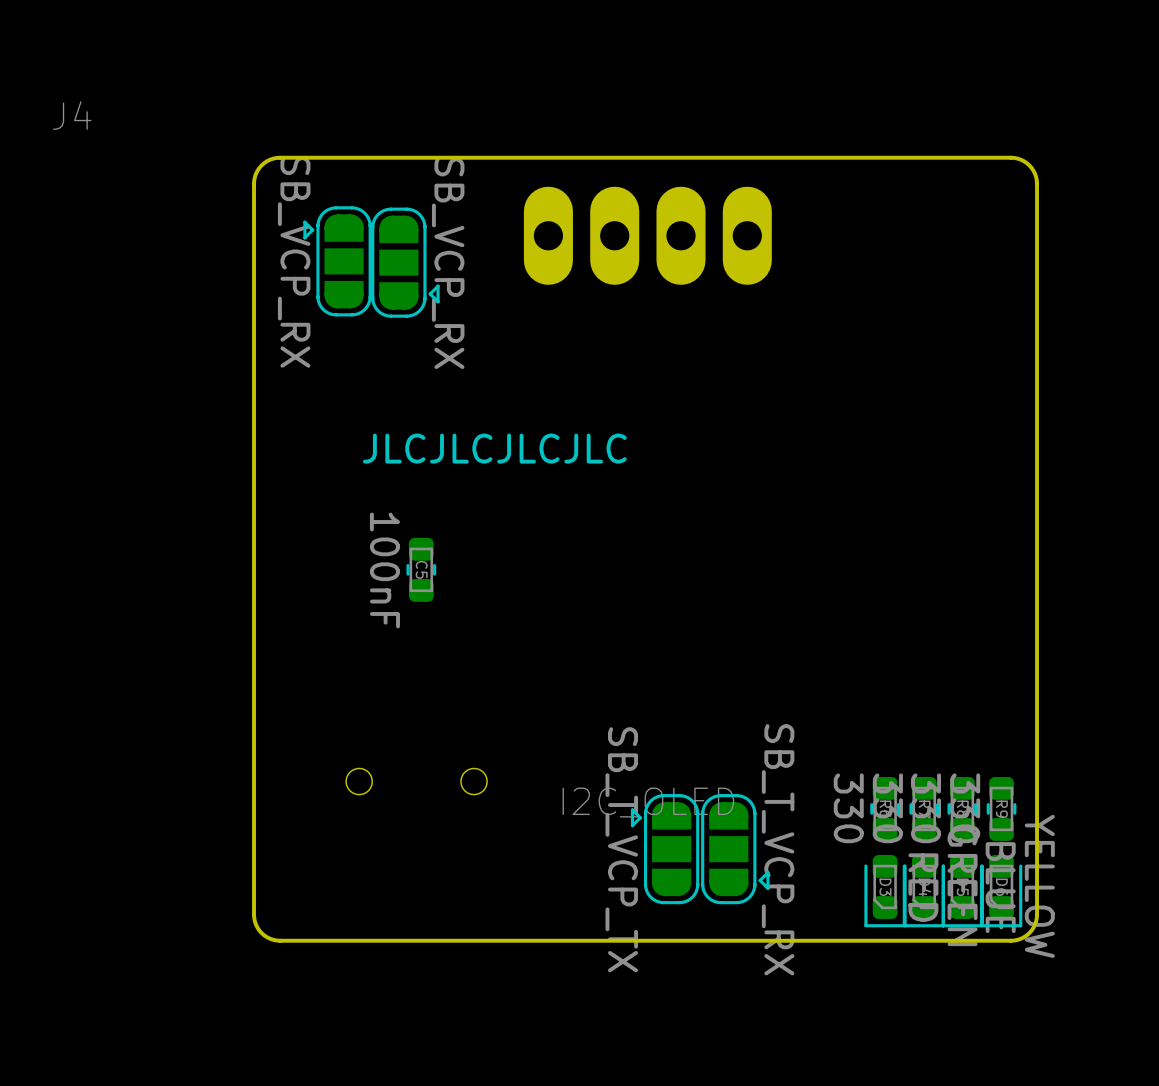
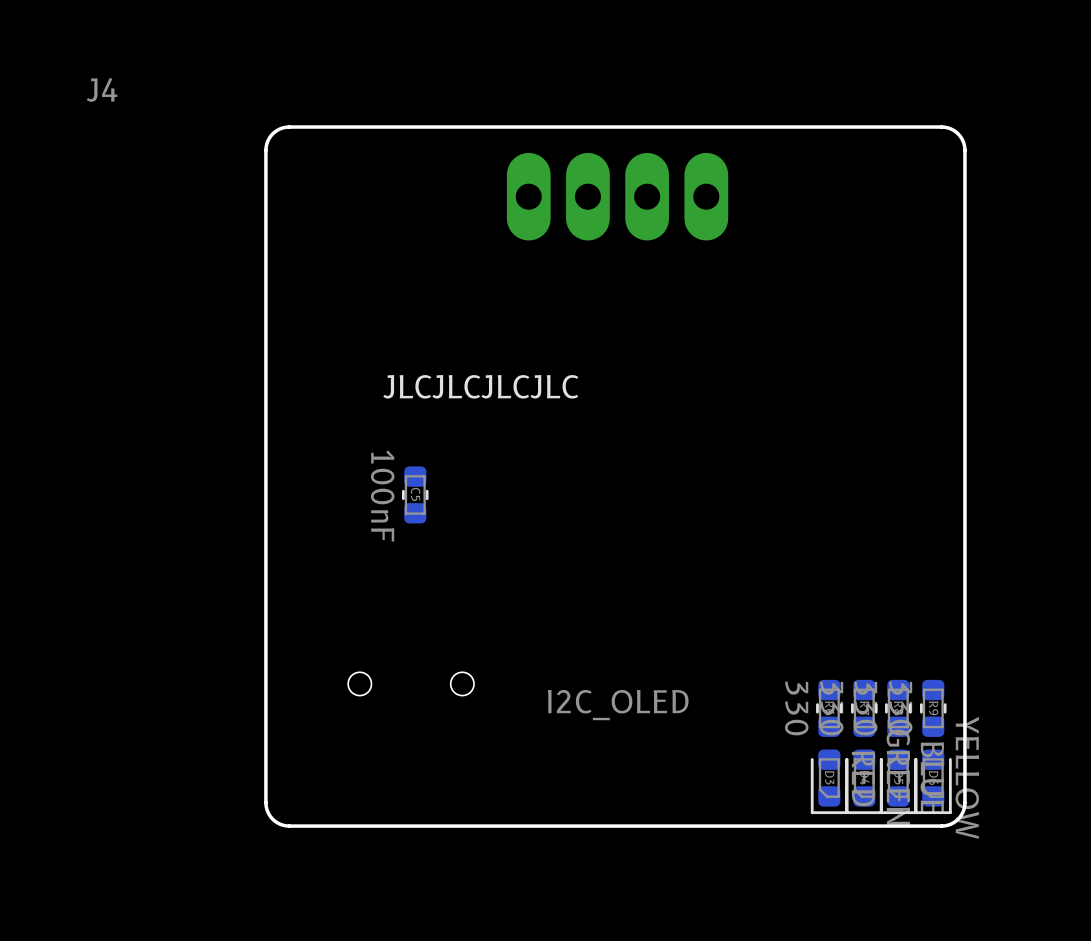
part: SB_VCP_RX (337, 261) -> none
part: SB_VCP_RX (405, 262) -> none
part: SB_T_VCP_TX (665, 849) -> none
part: SB_T_VCP_RX (735, 849) -> none

